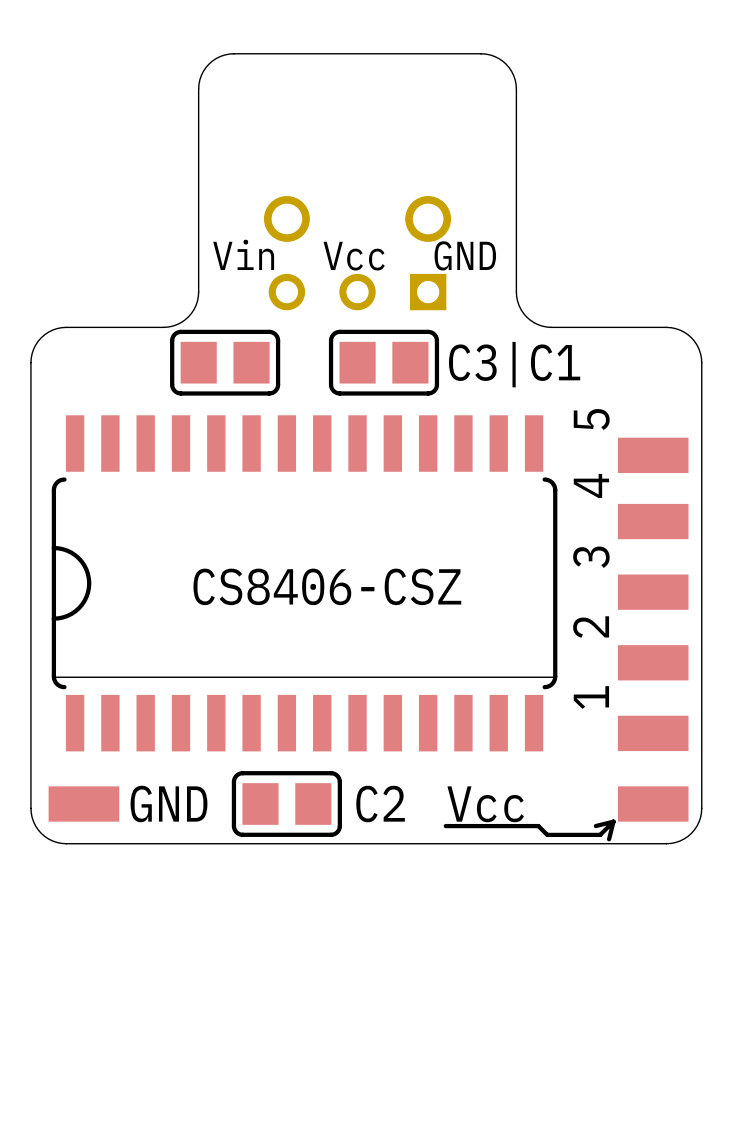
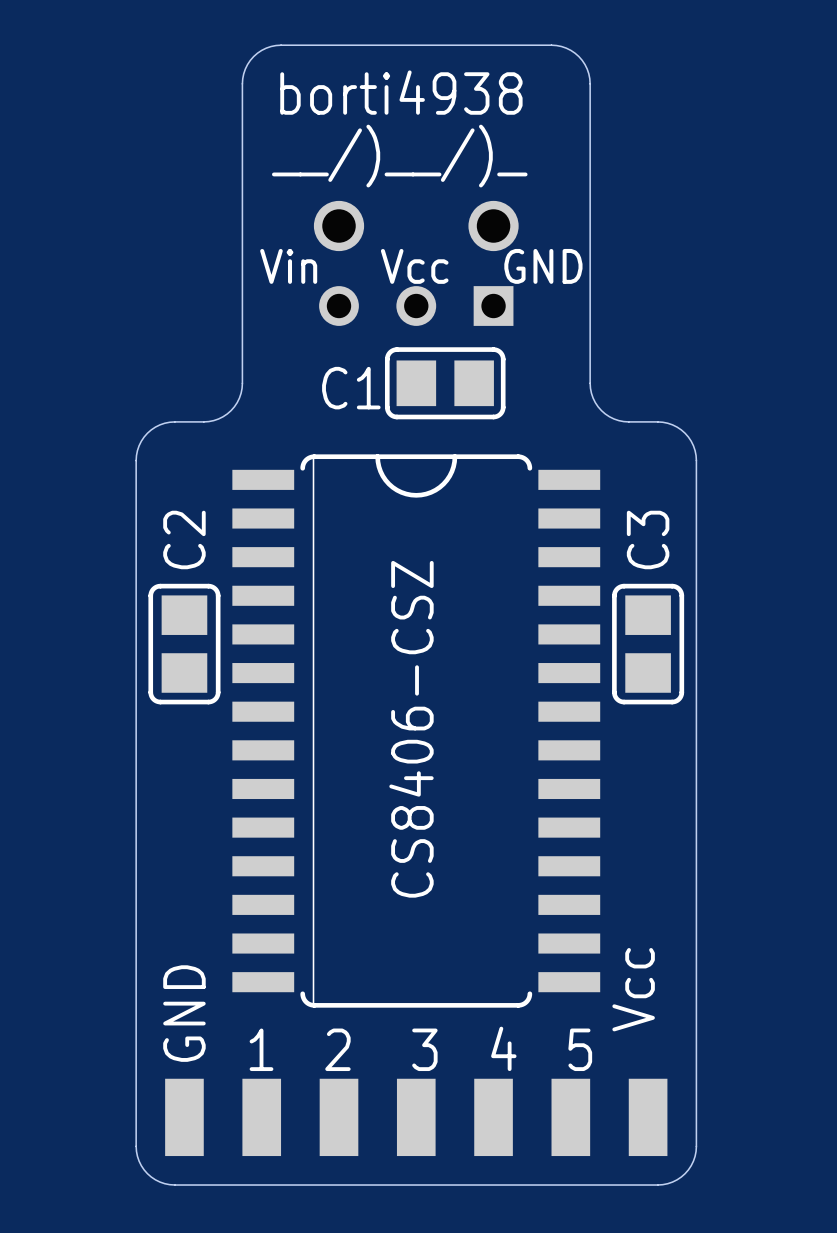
text: none -> borti4938 (401, 92)
text: none -> __/)__/)_ (399, 156)
board edge: (198, 292) (193, 309) (184, 320) (176, 324) (163, 327) (57, 328) (41, 337) (32, 353) (30, 808) (32, 817) (38, 829) (52, 841) (66, 843) (675, 842) (684, 838) (694, 829) (700, 817) (701, 808) (700, 353) (697, 345) (687, 334) (671, 327) (542, 326) (534, 322) (523, 313) (517, 301) (516, 292) -> (242, 306) (242, 388) (234, 406) (223, 416) (213, 420) (169, 422) (155, 427) (141, 441) (136, 455) (136, 1146) (137, 1156) (144, 1169) (155, 1179) (169, 1184) (657, 1185) (677, 1179) (688, 1169) (693, 1161) (696, 1146) (696, 455) (691, 441) (677, 427) (662, 422) (618, 420) (609, 416) (598, 406) (590, 388) (590, 306)
part: (225, 362) -> none
text: C3|C1 (514, 364) -> none
text: none -> C1 (351, 388)
text rotation: 0° (591, 419) -> 90° clockwise (580, 1049)
text position: 5 (591, 419) -> 5 (580, 1049)
part: (653, 455) -> none
text rotation: 0° (591, 485) -> 90° clockwise (503, 1048)
text position: 4 (591, 485) -> 4 (503, 1048)
text: none -> C3 (648, 539)
part: (653, 521) -> none
text rotation: 0° (591, 557) -> 90° clockwise (424, 1049)
text position: 3 (591, 557) -> 3 (424, 1049)
part rotation: 0° (304, 583) -> 90° clockwise (416, 731)
part: (653, 592) -> none
part: none -> (184, 644)
part: none -> (648, 644)
text rotation: 0° (591, 627) -> 90° clockwise (337, 1049)
text position: 2 (591, 627) -> 2 (337, 1049)
part: (653, 662) -> none
text rotation: 0° (591, 697) -> 90° clockwise (261, 1049)
text position: 1 (591, 697) -> 1 (261, 1049)
part: (653, 733) -> none
part: (83, 804) -> none
text rotation: 0° (169, 804) -> 90° counterclockwise (184, 1013)
text position: GND (169, 804) -> GND (184, 1013)
part: (286, 804) -> none
text rotation: 0° (380, 804) -> 90° counterclockwise (184, 539)
text position: C2 (380, 804) -> C2 (184, 539)
text rotation: 0° (485, 804) -> 90° counterclockwise (633, 989)
text position: Vcc (485, 804) -> Vcc (633, 989)
part: (653, 804) -> none
line: (613, 821) (595, 826) -> none
line: (613, 821) (609, 839) -> none
line: (613, 821) (600, 834) (547, 834) (538, 826) (445, 826) -> none
part: none -> (184, 1117)
part: none -> (261, 1117)
part: none -> (339, 1117)
part: none -> (416, 1117)
part: none -> (493, 1117)
part: none -> (570, 1117)
part: none -> (648, 1117)

